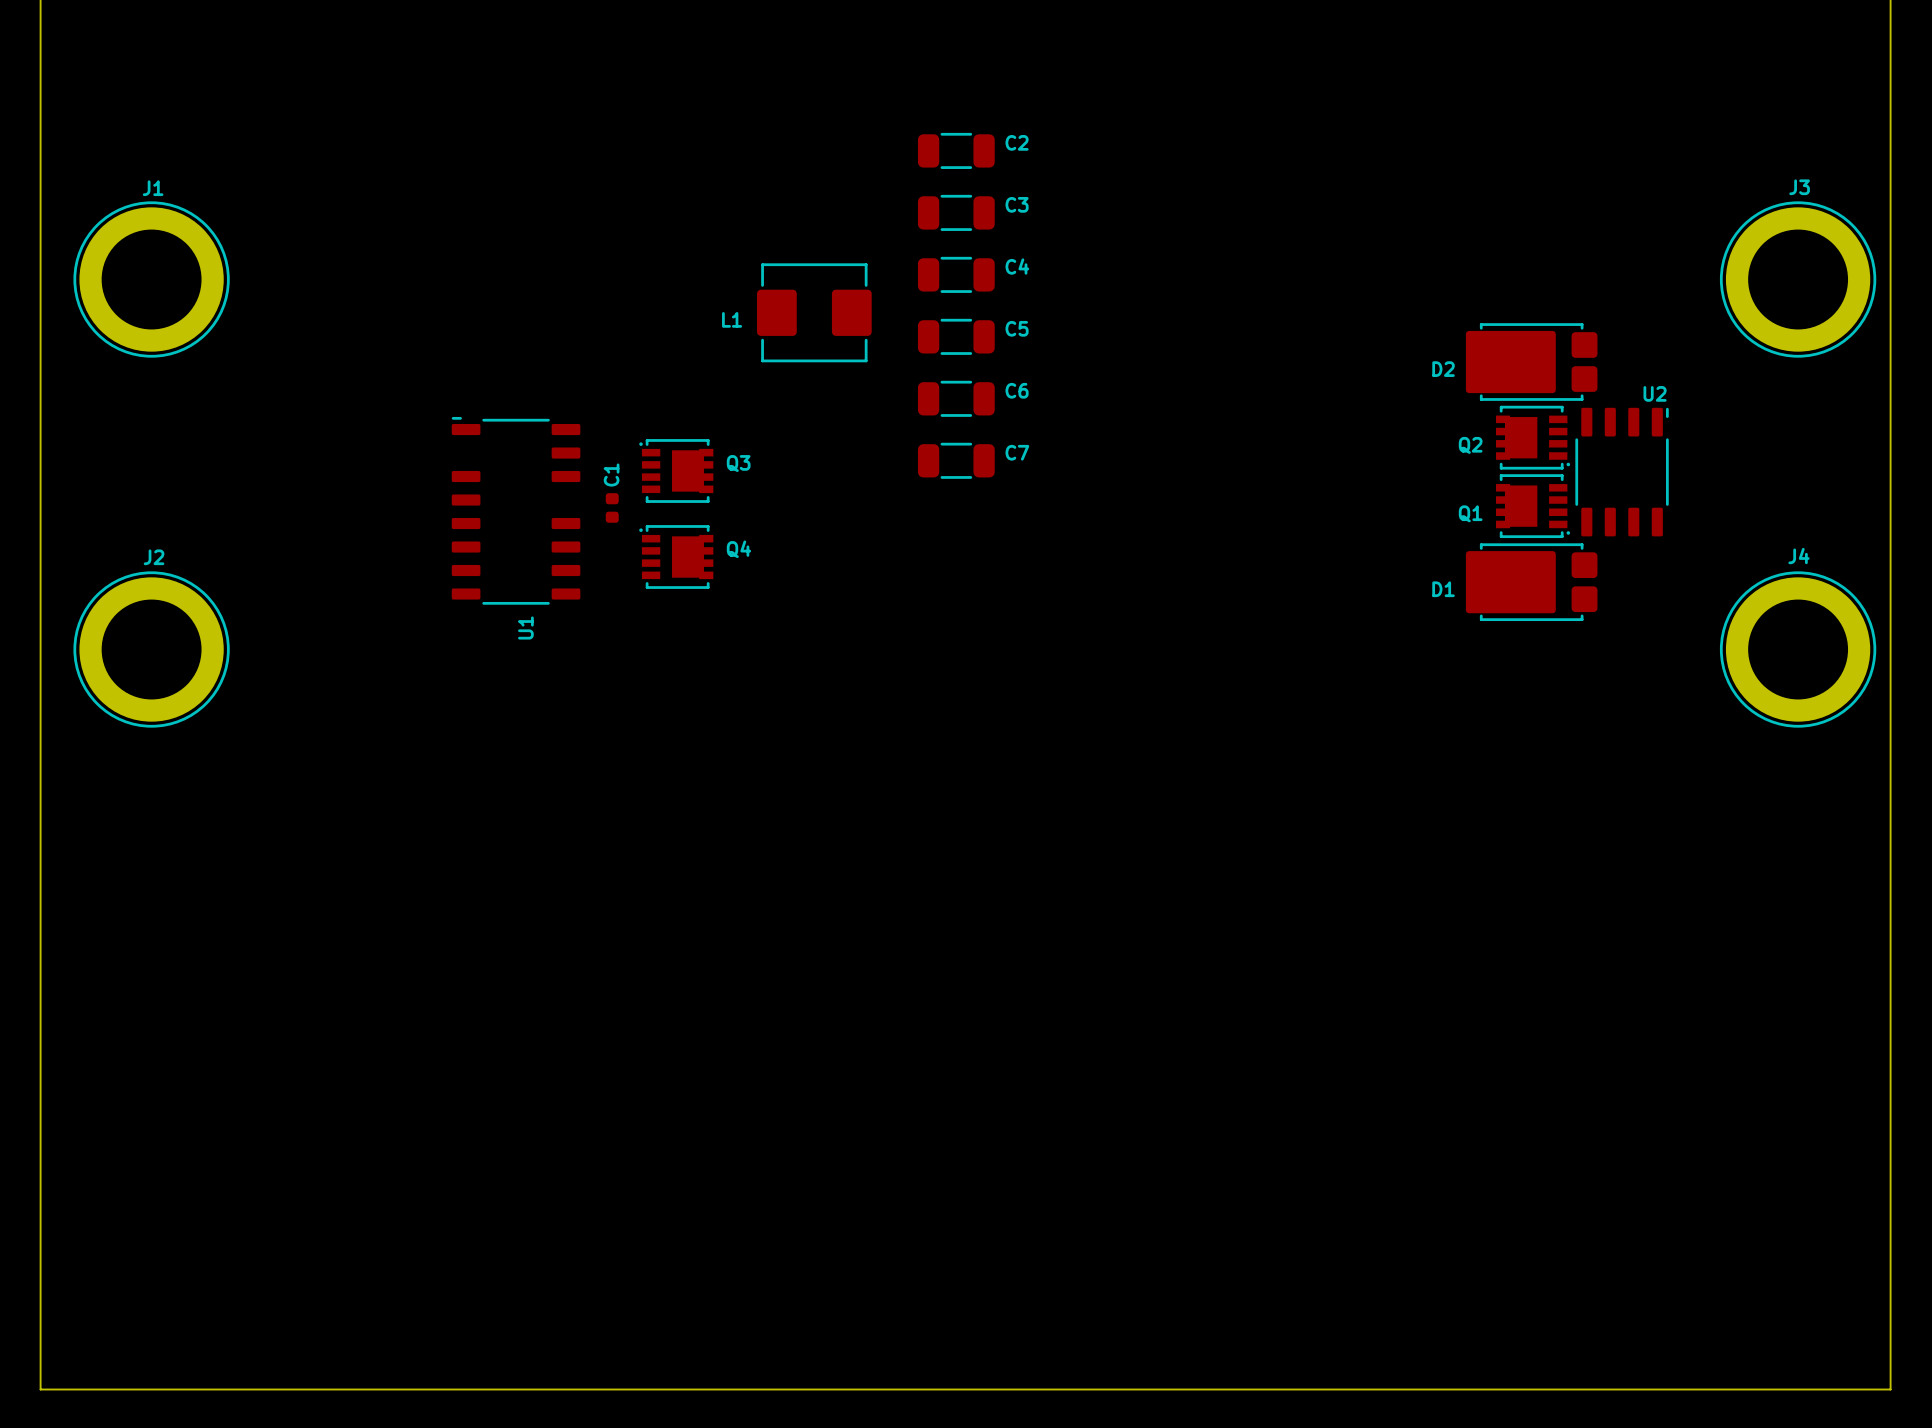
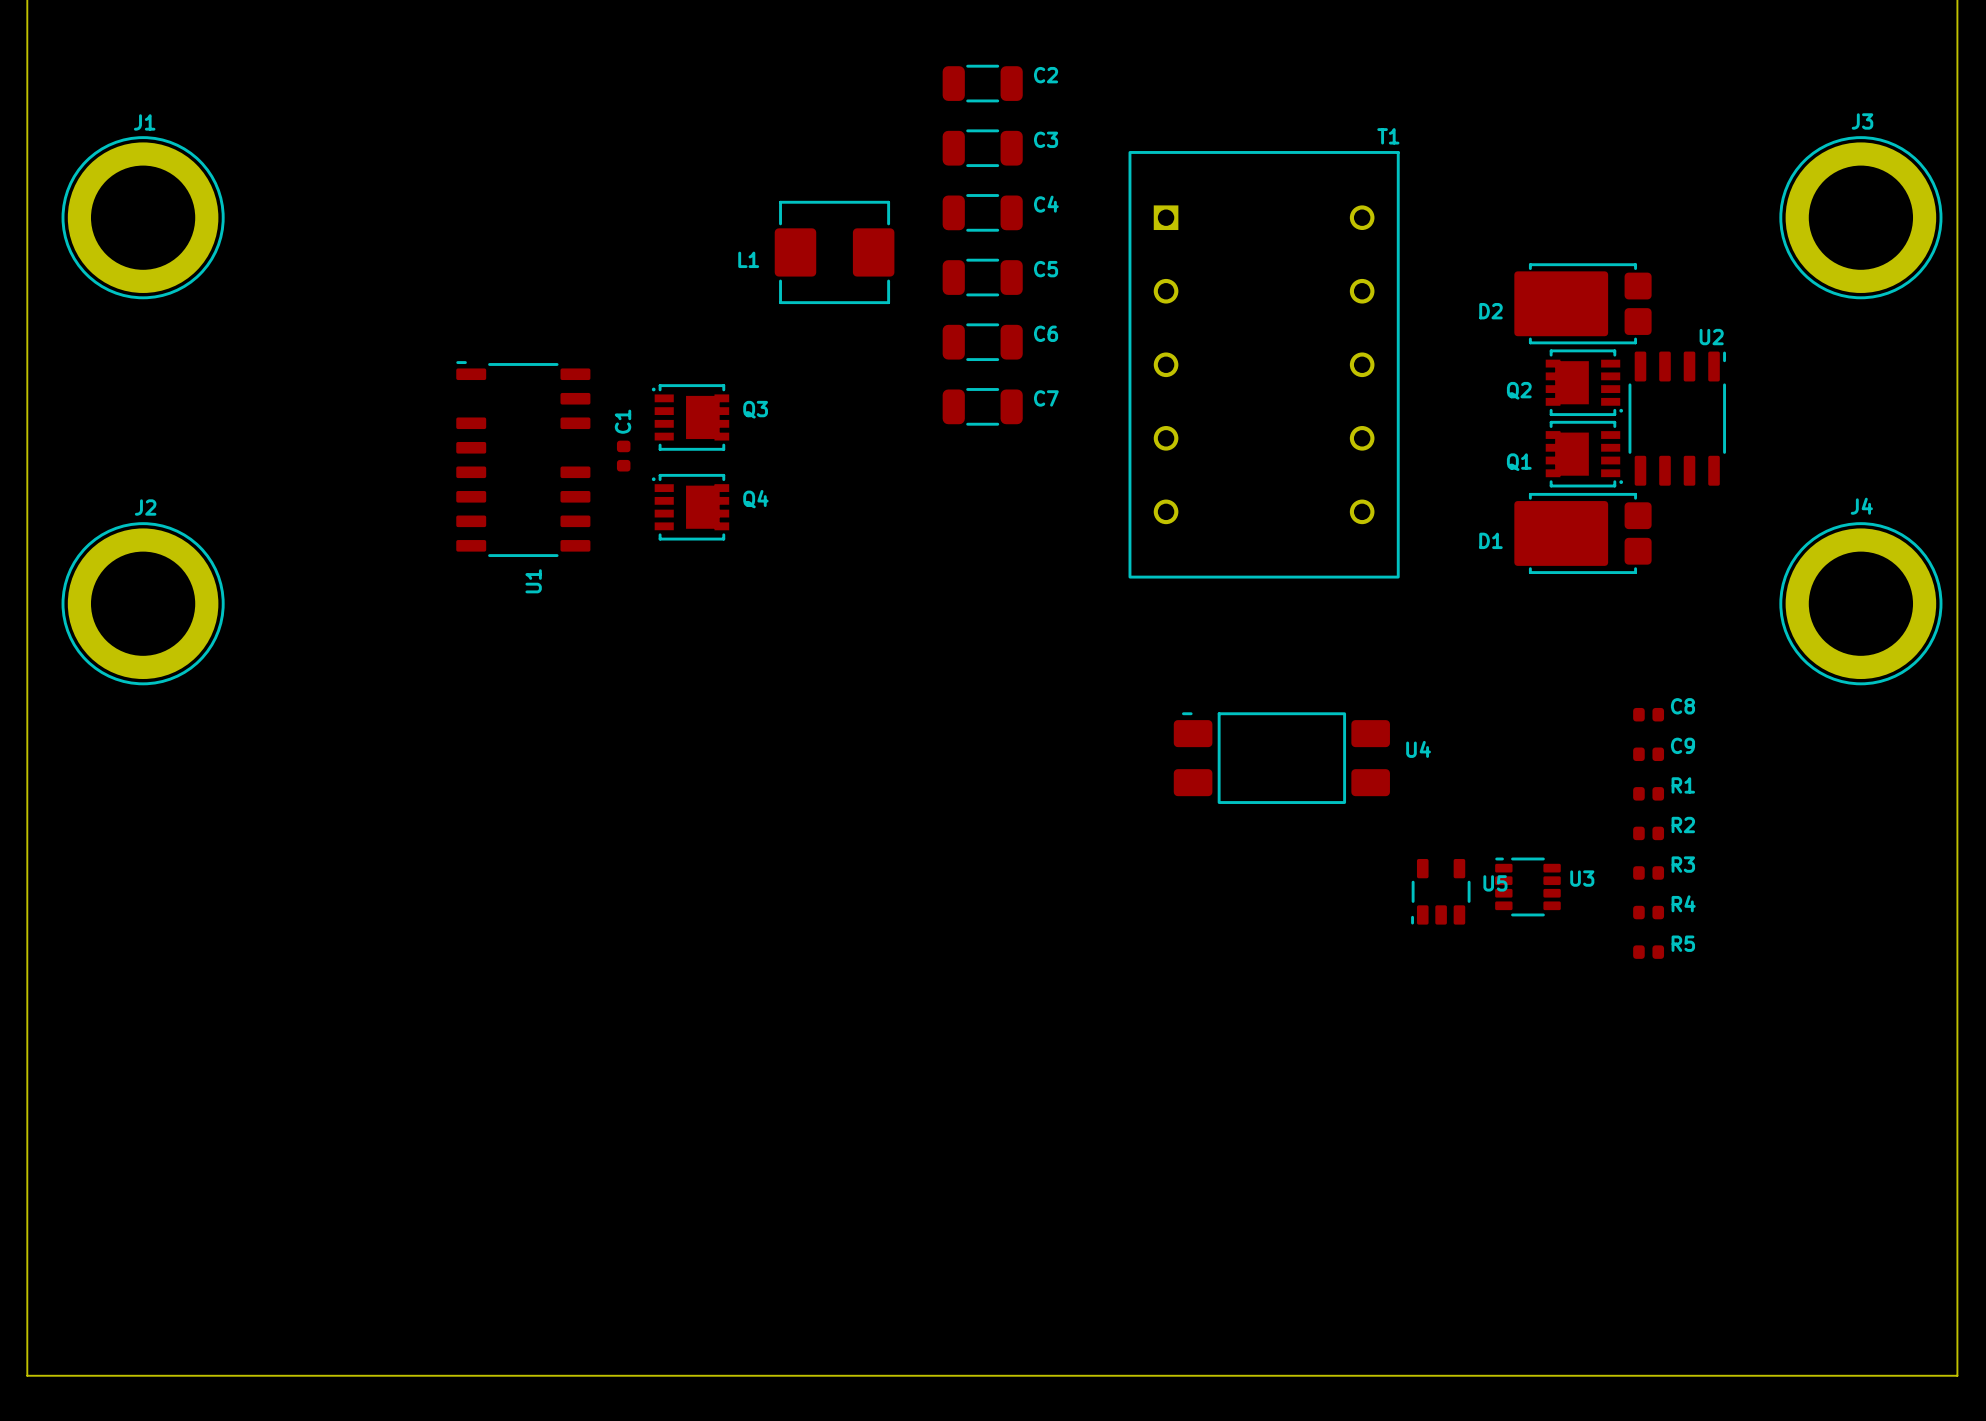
T1: none -> (1264, 364)
C8: none -> (1648, 714)
C9: none -> (1648, 754)
U4: none -> (1281, 758)
R1: none -> (1648, 793)
R2: none -> (1648, 833)
R3: none -> (1648, 872)
U3: none -> (1527, 886)
U5: none -> (1440, 891)
R4: none -> (1648, 912)
R5: none -> (1648, 952)

